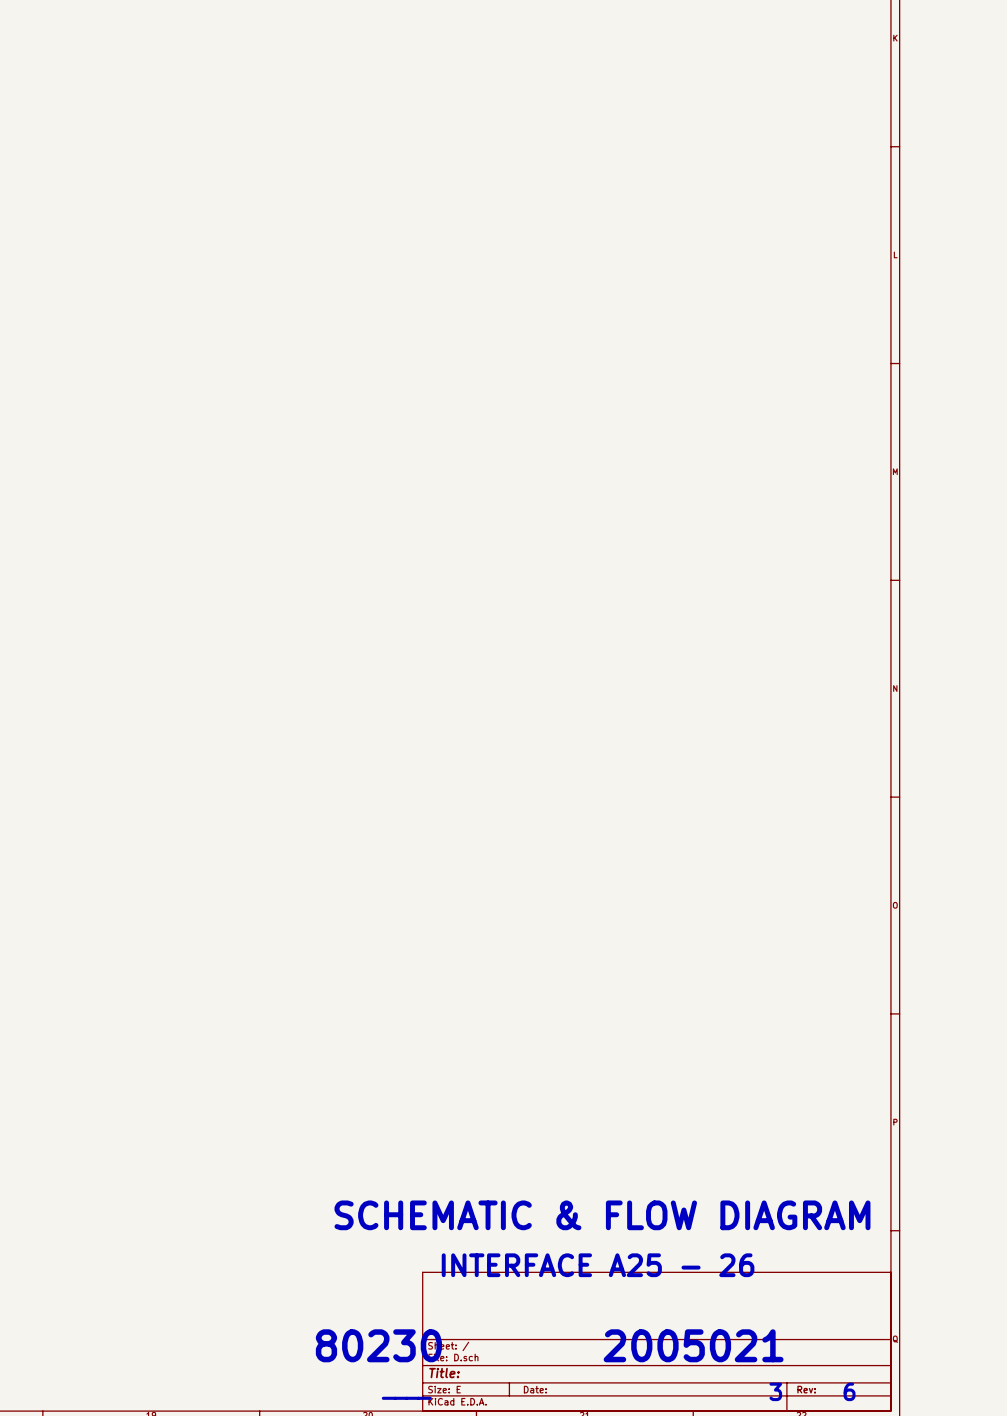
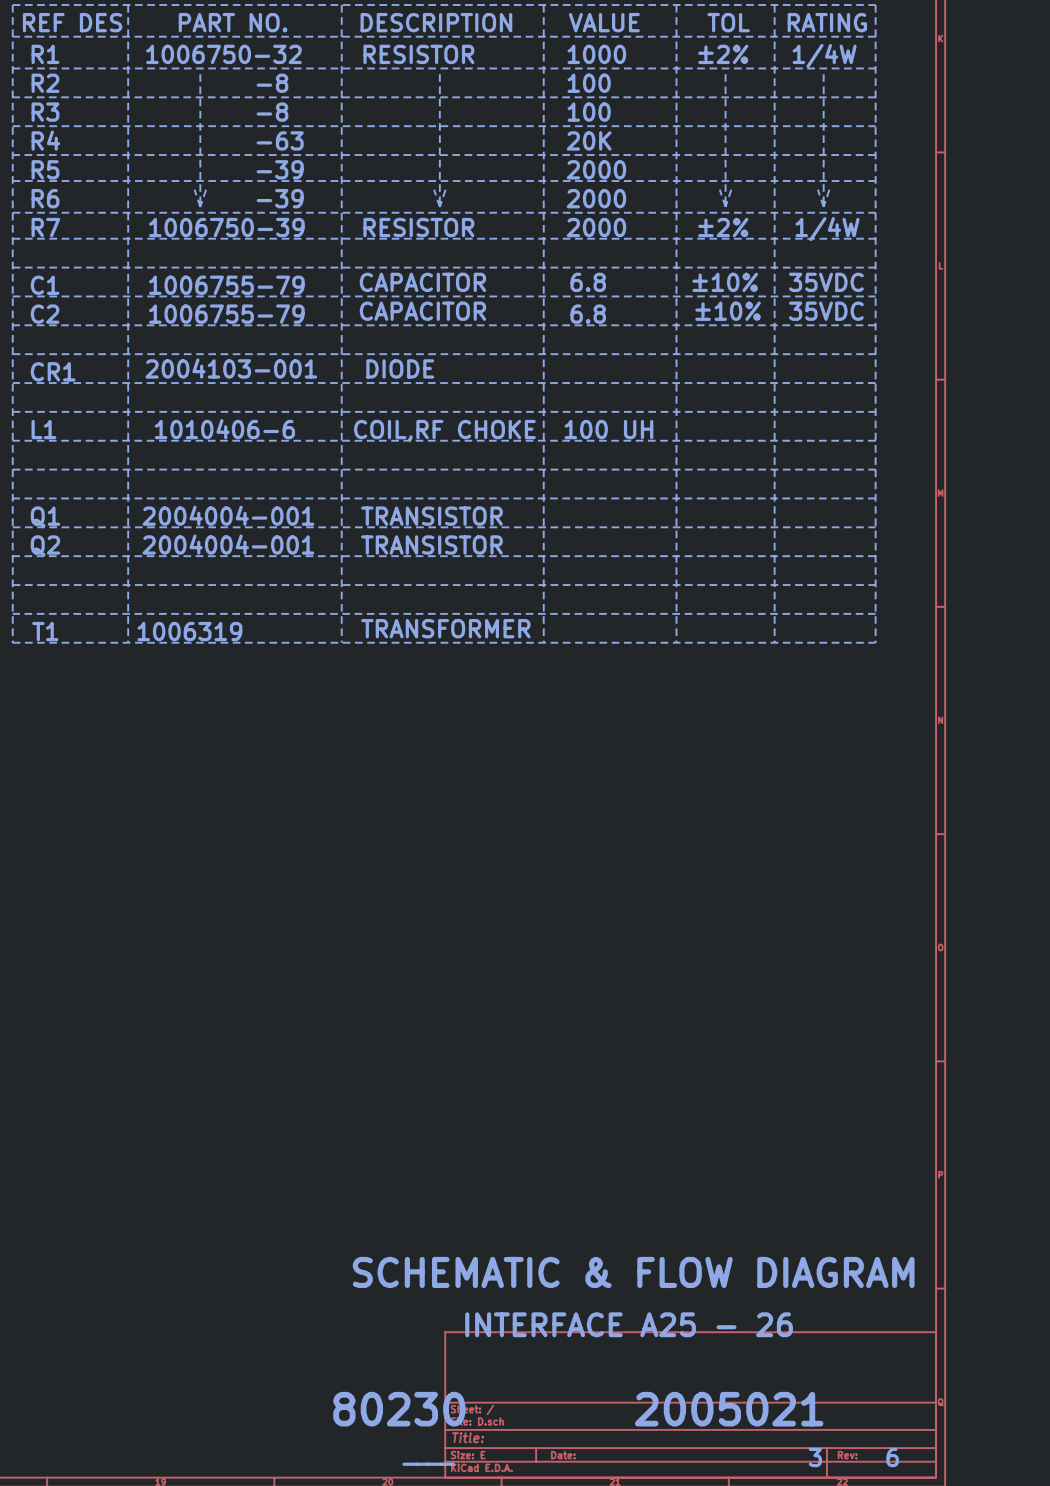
line: none -> (12, 4) (875, 4) (875, 642) (12, 642) (12, 4)
line: none -> (128, 4) (128, 642)
line: none -> (341, 4) (341, 642)
line: none -> (543, 4) (543, 642)
line: none -> (676, 4) (676, 642)
line: none -> (774, 4) (774, 642)
text: none -> REF DES (72, 22)
text: none -> PART NO. (233, 22)
text: none -> DESCRIPTION (436, 22)
text: none -> VALUE (604, 22)
text: none -> TOL (728, 22)
text: none -> RATING (827, 22)
line: none -> (12, 36) (875, 36)
text: none -> R1 (45, 54)
text: none -> 1006750-32 (224, 54)
text: none -> RESISTOR (418, 54)
text: none -> 1000 (596, 54)
text: none -> ±2% (723, 54)
text: none -> 1/4W (824, 55)
line: none -> (12, 68) (875, 68)
line: none -> (200, 74) (200, 206)
line: none -> (439, 74) (439, 206)
line: none -> (725, 74) (725, 206)
line: none -> (823, 74) (823, 206)
text: none -> R2 (45, 83)
text: none -> -8 (272, 83)
text: none -> 100 (589, 83)
line: none -> (12, 97) (875, 97)
text: none -> R3 (45, 112)
text: none -> -8 (272, 112)
text: none -> 100 (589, 112)
line: none -> (12, 126) (875, 126)
text: none -> R4 (45, 140)
text: none -> -63 (280, 140)
text: none -> 20K (589, 140)
line: none -> (12, 155) (875, 155)
text: none -> R5 (45, 169)
text: none -> -39 (280, 169)
text: none -> 2000 (596, 169)
line: none -> (12, 181) (875, 181)
line: none -> (194, 189) (200, 206)
line: none -> (206, 189) (200, 206)
line: none -> (434, 189) (439, 206)
line: none -> (445, 189) (439, 206)
line: none -> (719, 189) (725, 206)
line: none -> (731, 189) (725, 206)
line: none -> (817, 189) (823, 206)
line: none -> (829, 189) (823, 206)
text: none -> R6 (45, 198)
text: none -> -39 (280, 198)
text: none -> 2000 (596, 198)
line: none -> (12, 212) (875, 212)
text: none -> R7 (45, 227)
text: none -> 1006750-39 (226, 227)
text: none -> RESISTOR (418, 227)
text: none -> 2000 (596, 227)
text: none -> ±2% (723, 227)
text: none -> 1/4W (827, 229)
line: none -> (12, 238) (875, 238)
line: none -> (12, 267) (875, 267)
text: none -> CAPACITOR (422, 282)
text: none -> 6.8 (588, 282)
text: none -> ±10% (725, 282)
text: none -> 35VDC (826, 282)
text: none -> C1 (45, 285)
text: none -> 1006755-79 (226, 285)
line: none -> (12, 296) (875, 296)
text: none -> CAPACITOR (422, 311)
text: none -> ±10% (728, 311)
text: none -> 35VDC (826, 311)
text: none -> C2 (45, 314)
text: none -> 1006755-79 (226, 314)
text: none -> 6.8 (588, 314)
line: none -> (12, 325) (875, 325)
line: none -> (12, 354) (875, 354)
text: none -> 2004103-001 (231, 368)
text: none -> DIODE (400, 368)
text: none -> CR1 (53, 371)
line: none -> (12, 383) (875, 383)
line: none -> (12, 411) (875, 411)
text: none -> 1010406-6 (224, 429)
text: none -> L1 (43, 429)
text: none -> 100 UH (608, 429)
text: none -> COIL,RF CHOKE (444, 430)
line: none -> (12, 440) (875, 440)
line: none -> (12, 469) (875, 469)
line: none -> (12, 498) (875, 498)
text: none -> 2004004-001 (228, 515)
text: none -> TRANSISTOR (431, 516)
text: none -> Q1 (45, 516)
line: none -> (12, 527) (875, 527)
text: none -> 2004004-001 (228, 544)
text: none -> TRANSISTOR (431, 544)
text: none -> Q2 (45, 545)
line: none -> (12, 556) (875, 556)
line: none -> (12, 585) (875, 585)
line: none -> (12, 613) (875, 613)
text: none -> TRANSFORMER (445, 628)
text: none -> T1 (45, 631)
text: none -> 1006319 (189, 631)

